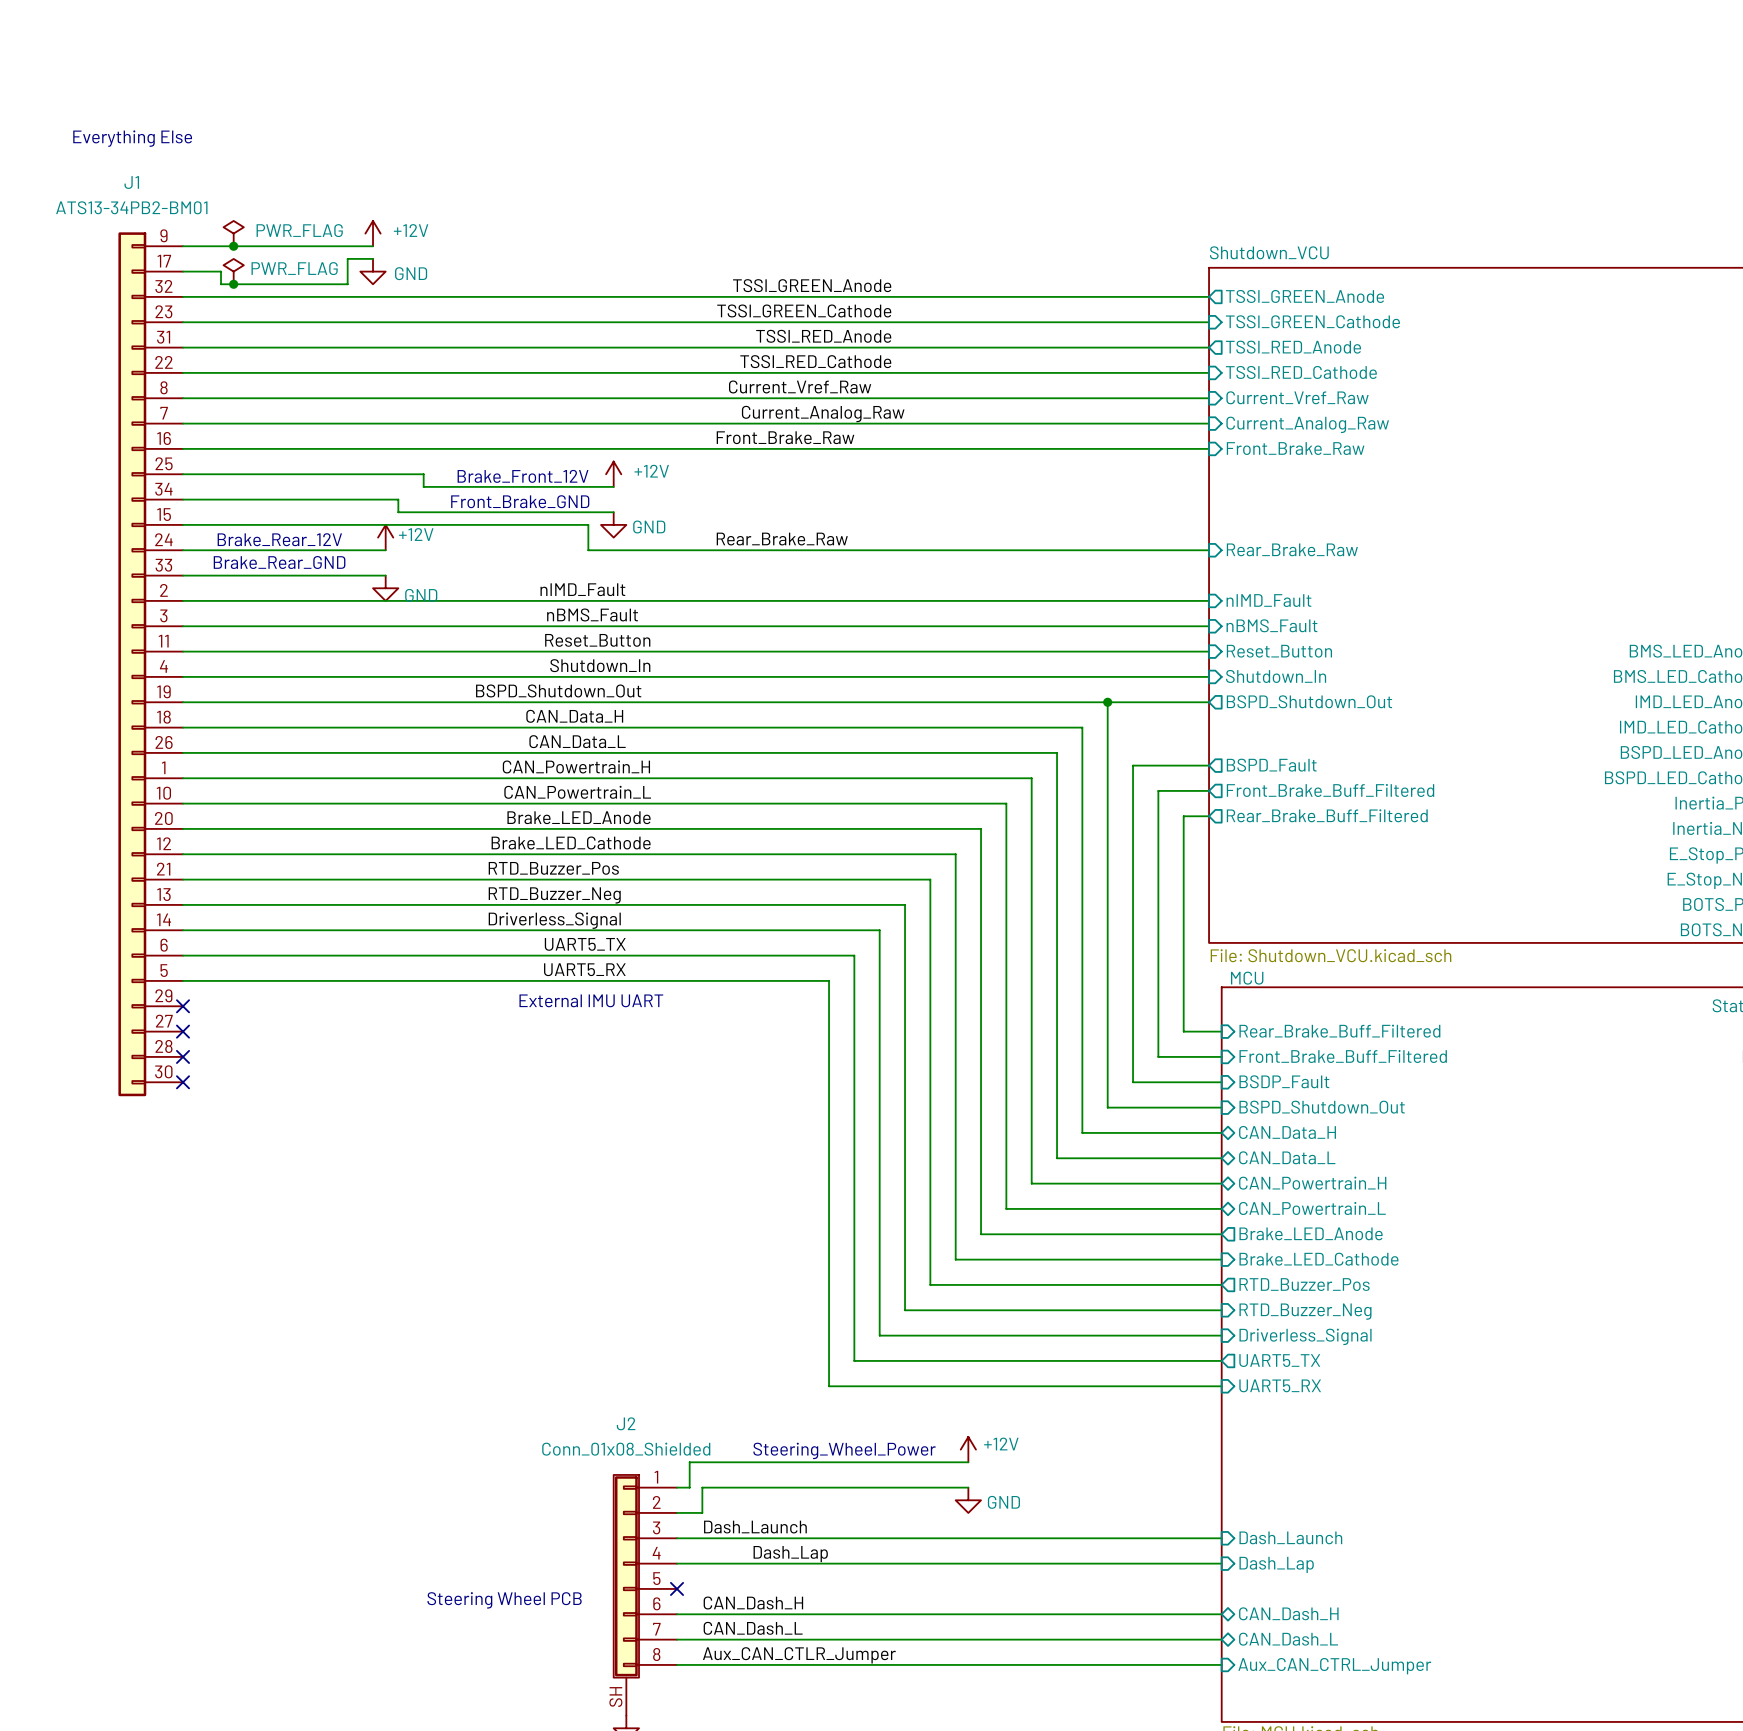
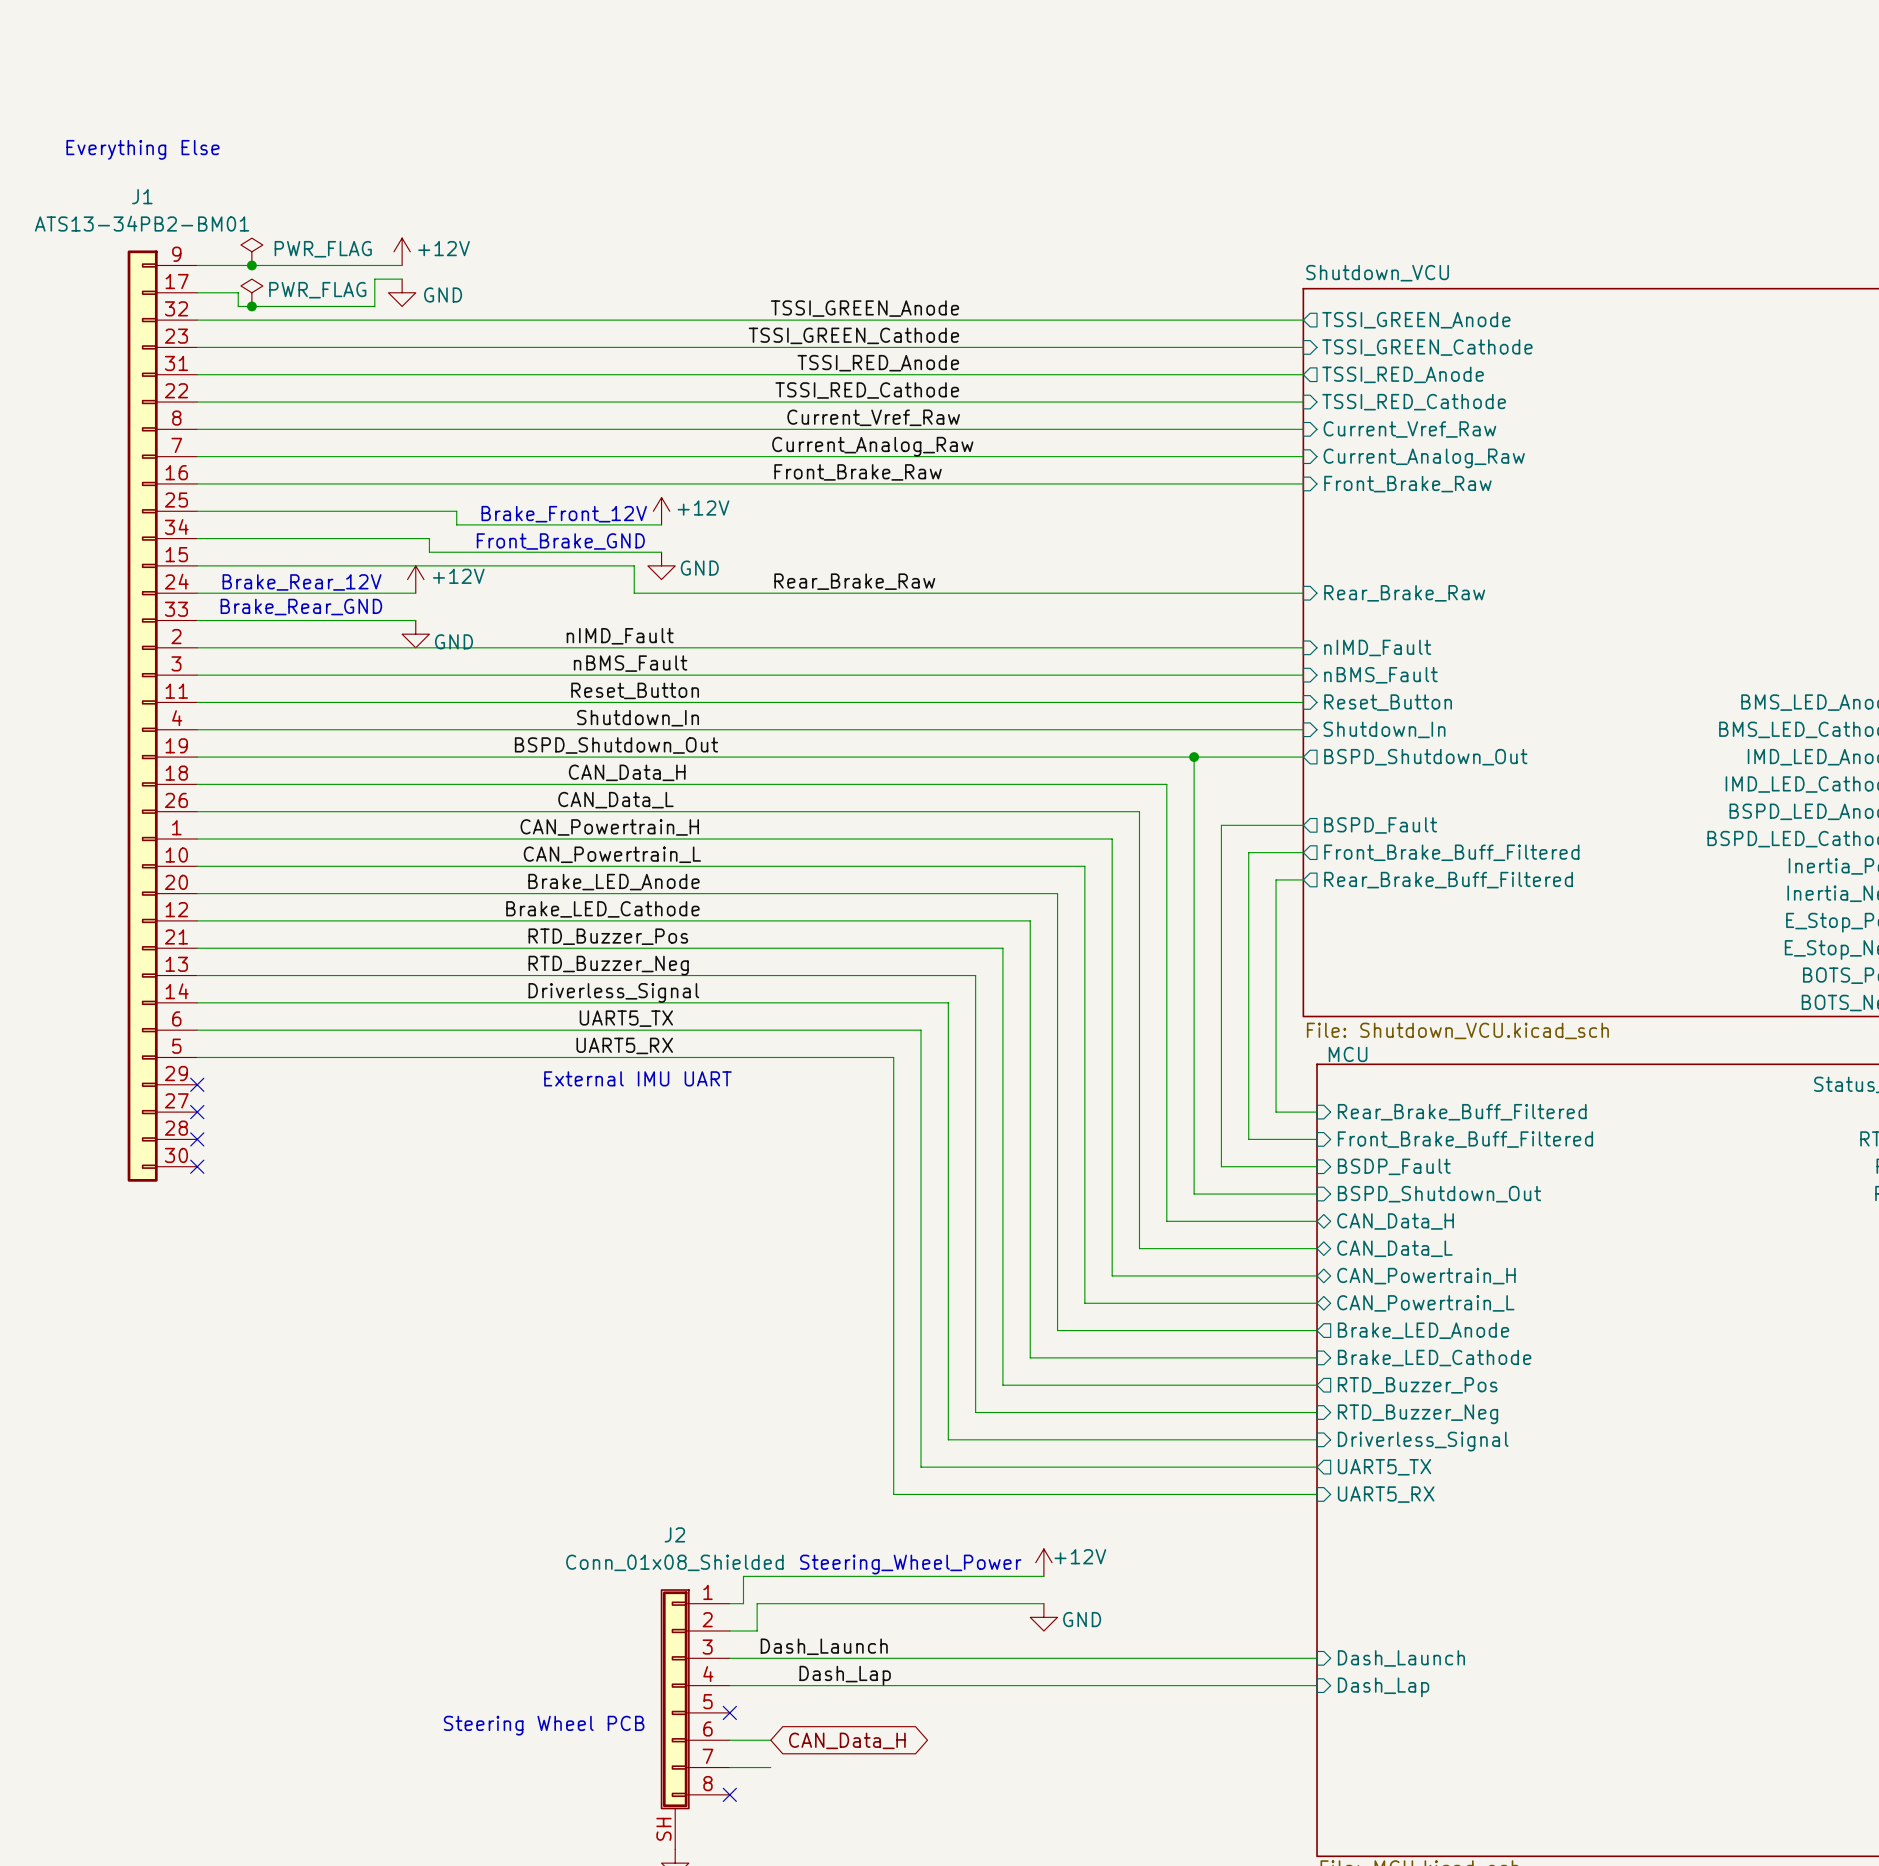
label: CAN_Dash_H (753, 1603) -> none
sheet pin: CAN_Dash_H (1288, 1613) -> none
wire: (715, 1614) (1221, 1614) -> none
global label: none -> CAN_Data_H (847, 1740)
label: CAN_Dash_L (753, 1628) -> none
wire: (715, 1639) (1221, 1639) -> none
sheet pin: CAN_Dash_L (1288, 1639) -> none
label: Aux_CAN_CTLR_Jumper (799, 1655) -> none
wire: (677, 1664) (1221, 1664) -> none
no-connect mark: none -> (729, 1794)
sheet pin: Aux_CAN_CTRL_Jumper (1334, 1666) -> none

